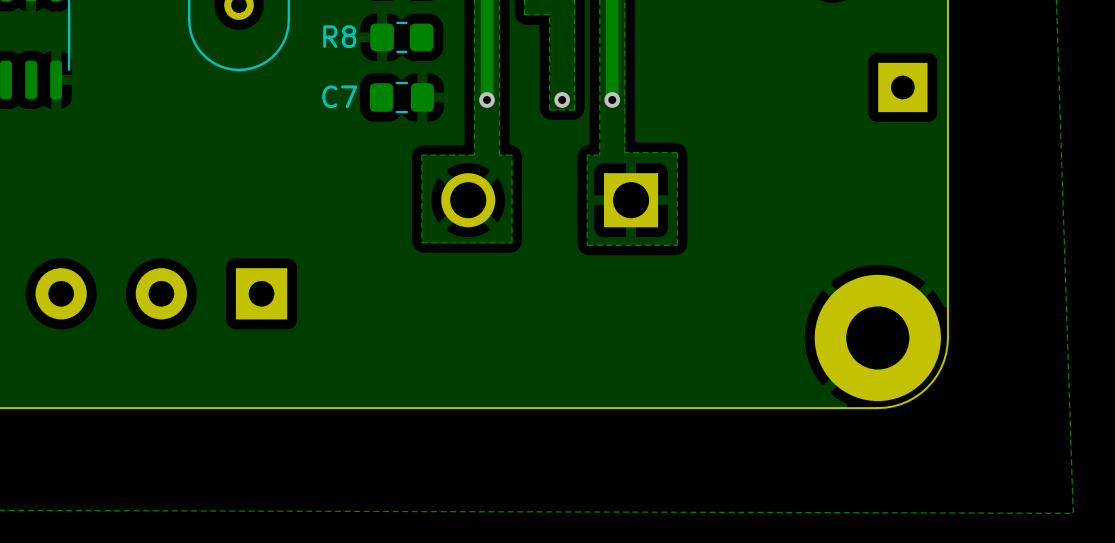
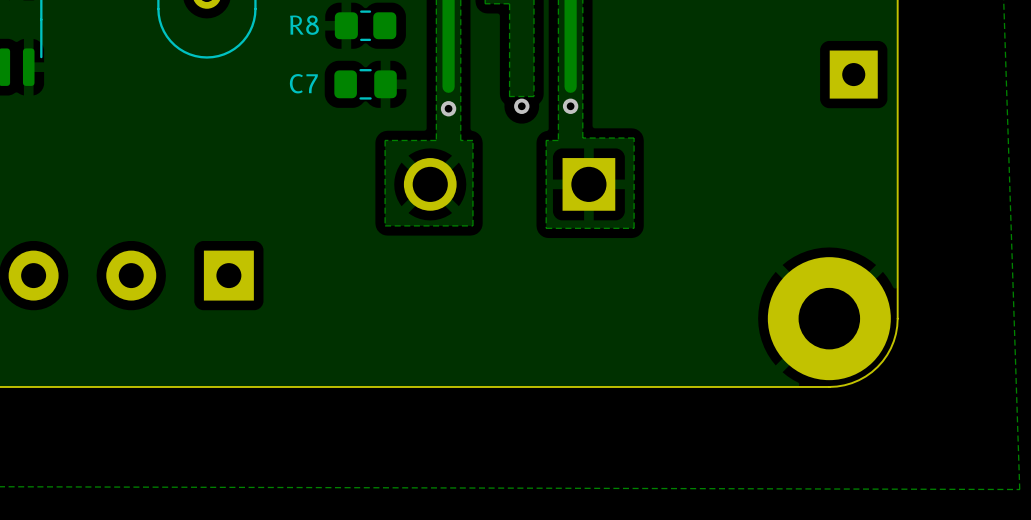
via position: (487, 99) -> (448, 108)
via position: (562, 99) -> (521, 106)
via position: (612, 99) -> (570, 106)

